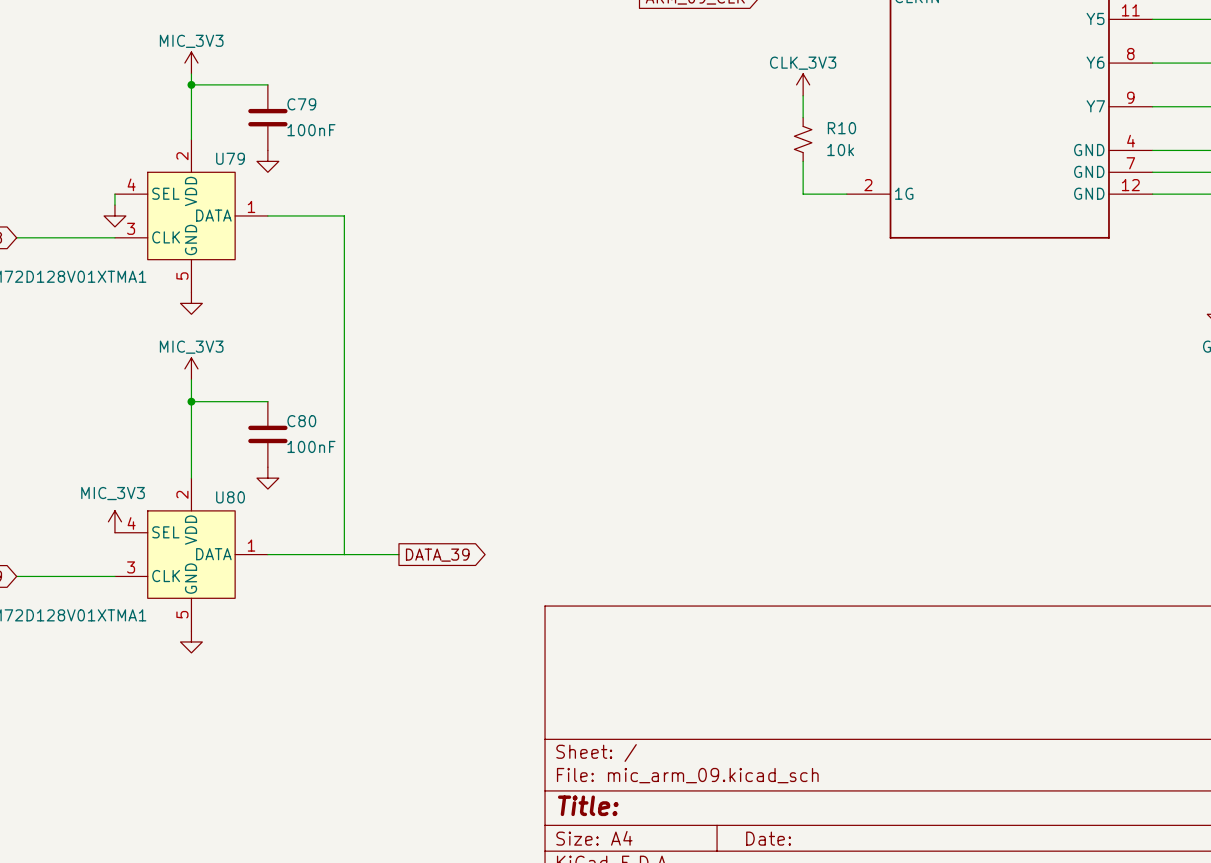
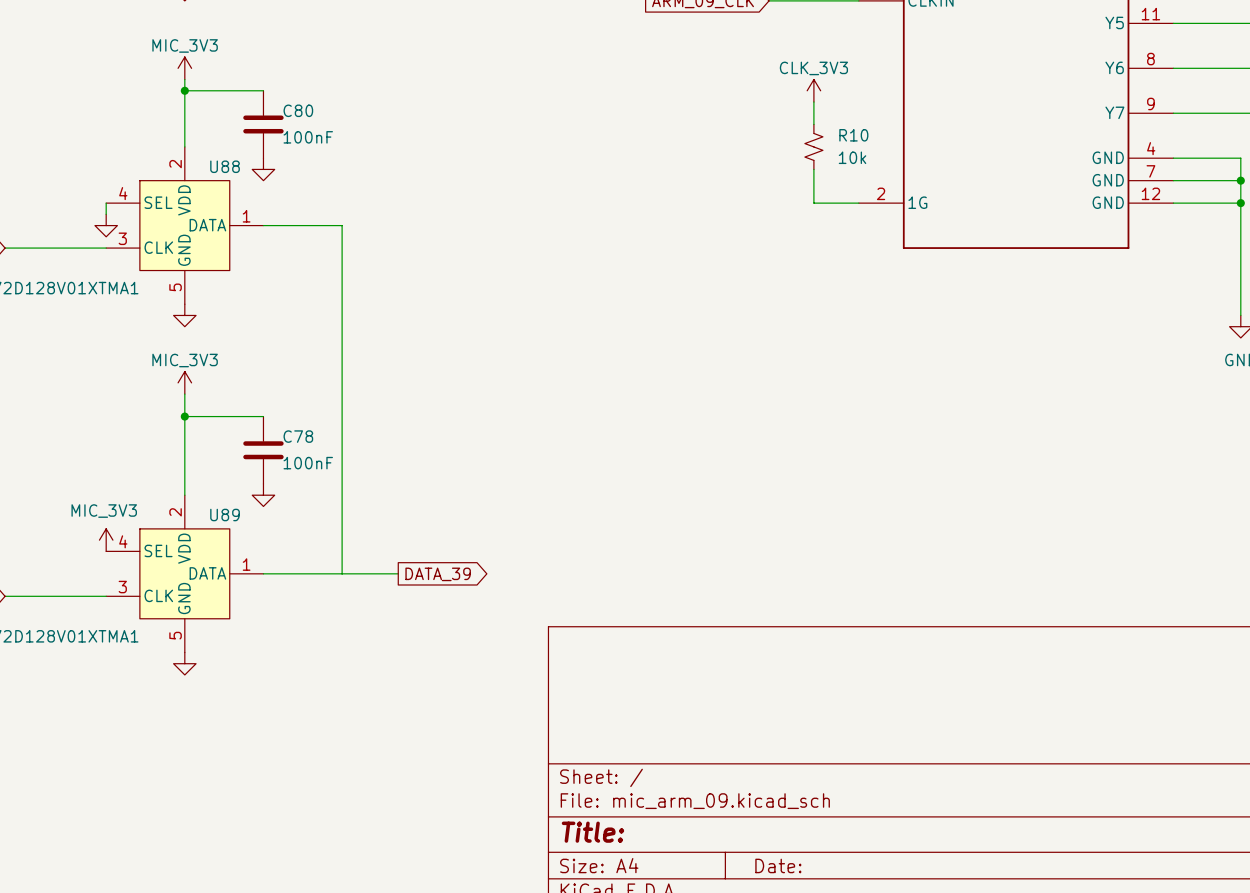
C79 name: C79 (301, 104) -> C80 (298, 110)
U79 name: U79 (230, 158) -> U88 (225, 166)
C80 name: C80 (301, 421) -> C78 (298, 436)
U80 name: U80 (230, 497) -> U89 (225, 515)

